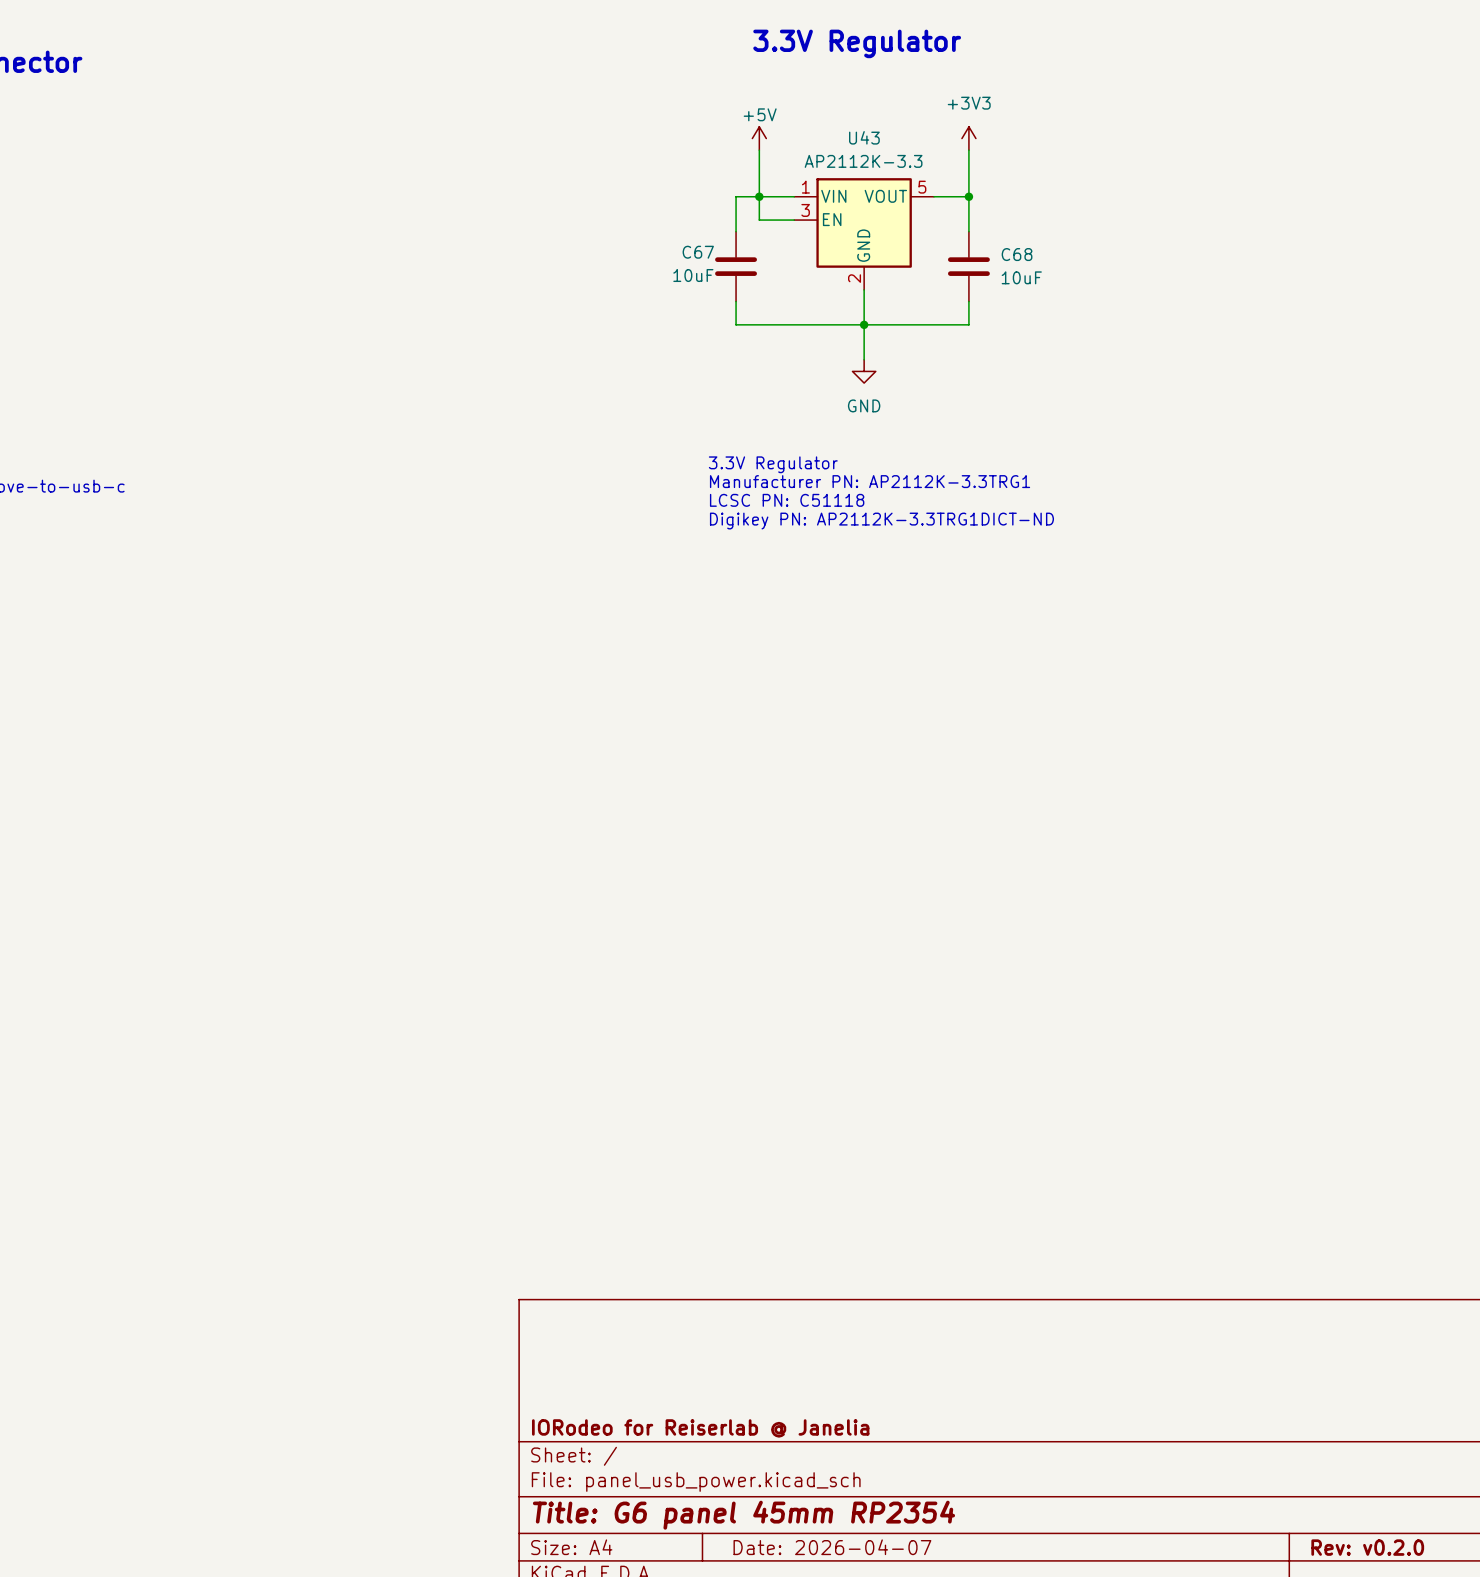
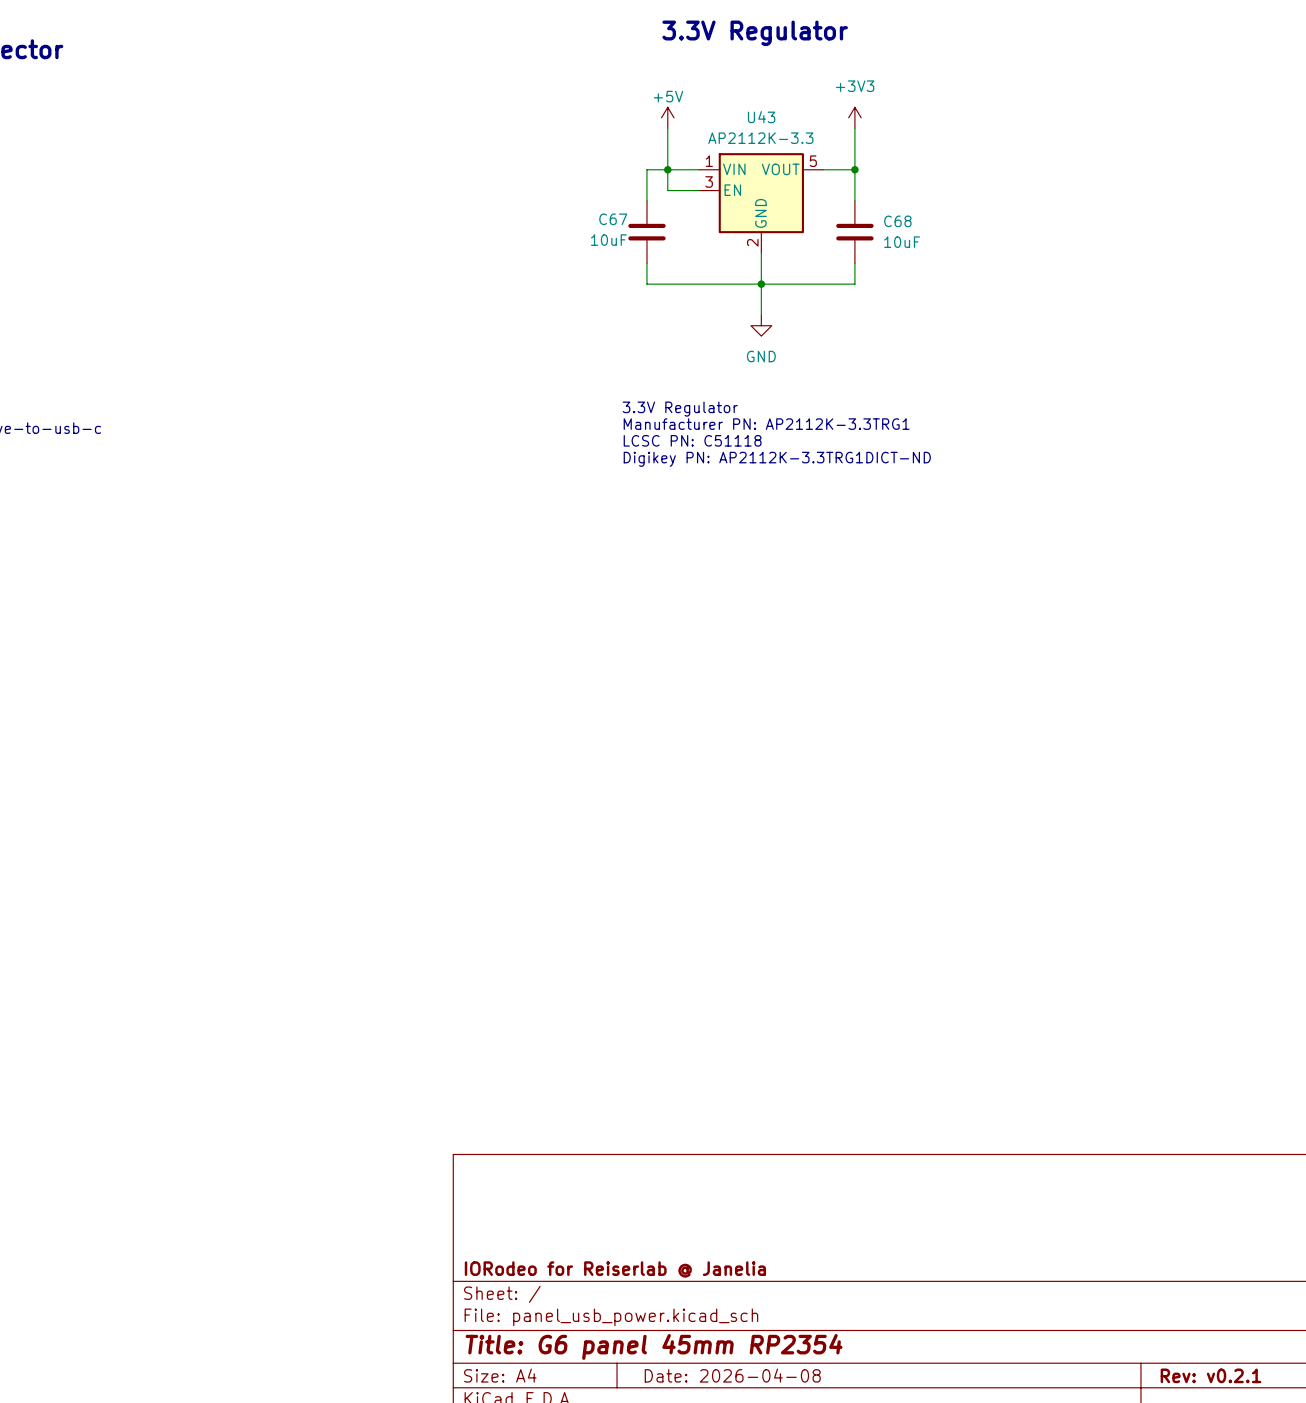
title block: Date: 2026-04-07 (832, 1547) -> Date: 2026-04-08 (732, 1375)
title block: Rev: v0.2.0 (1367, 1547) -> Rev: v0.2.1 (1211, 1375)

